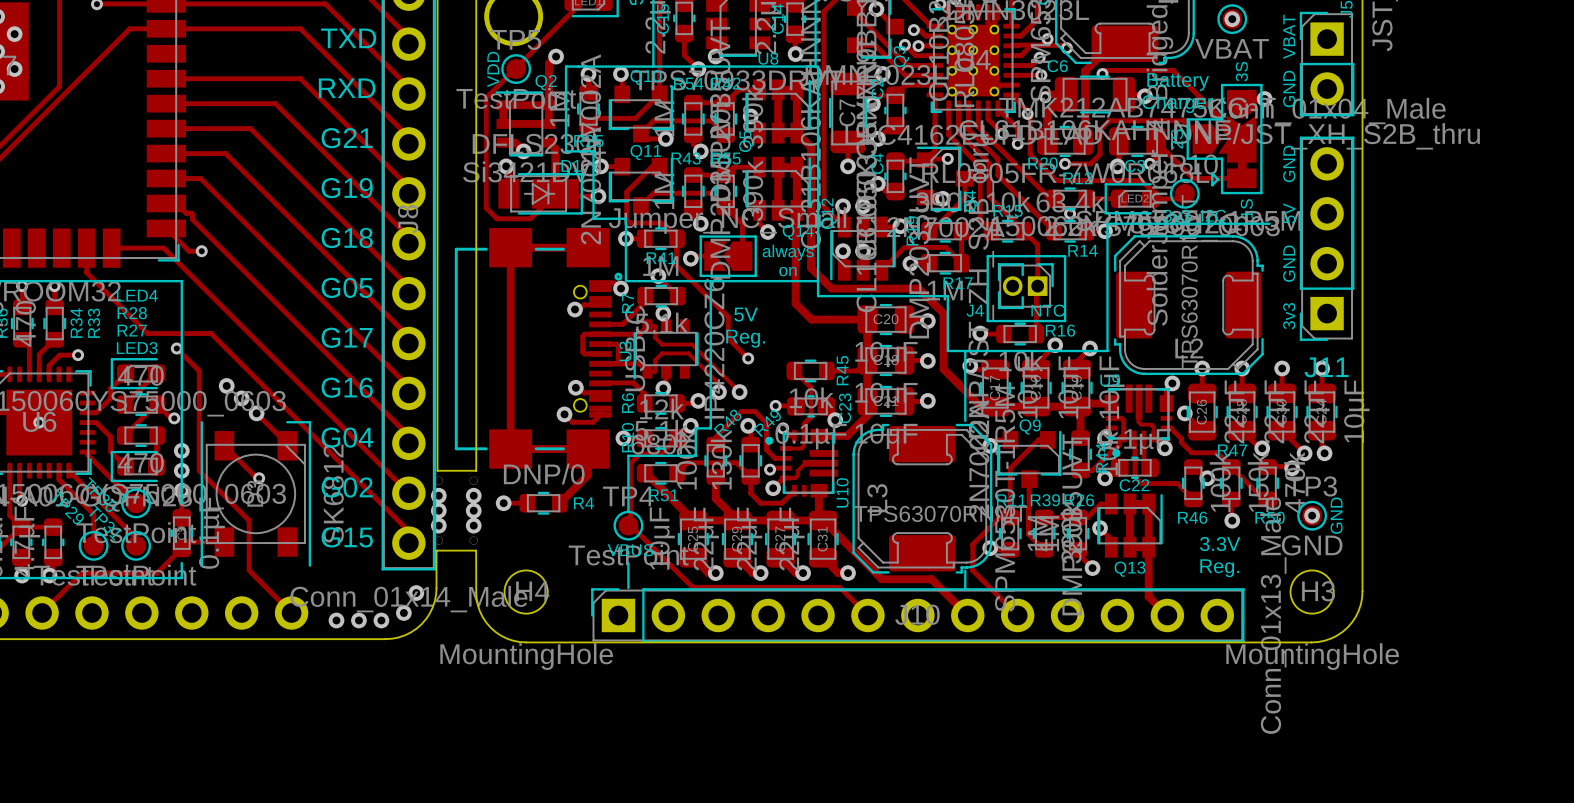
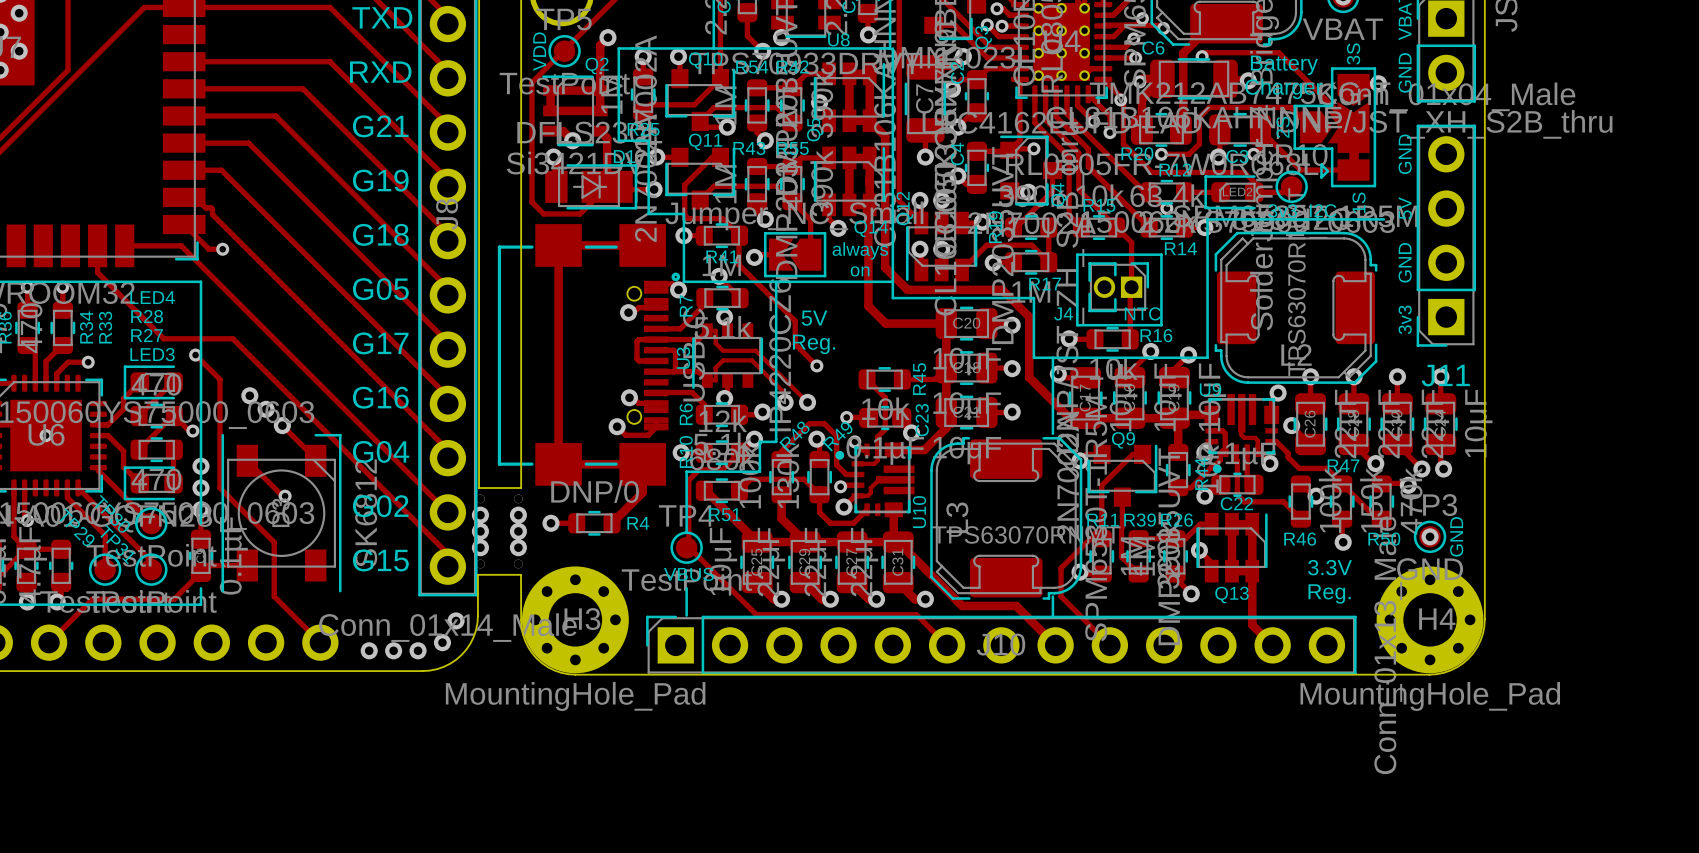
H4 footprint: [504, 570, 548, 614] -> [1376, 566, 1484, 674]
H3 footprint: [1290, 570, 1334, 614] -> [522, 566, 629, 674]
H4 value: MountingHole (526, 656) -> MountingHole_Pad (1430, 696)
H3 value: MountingHole (1312, 656) -> MountingHole_Pad (575, 696)

